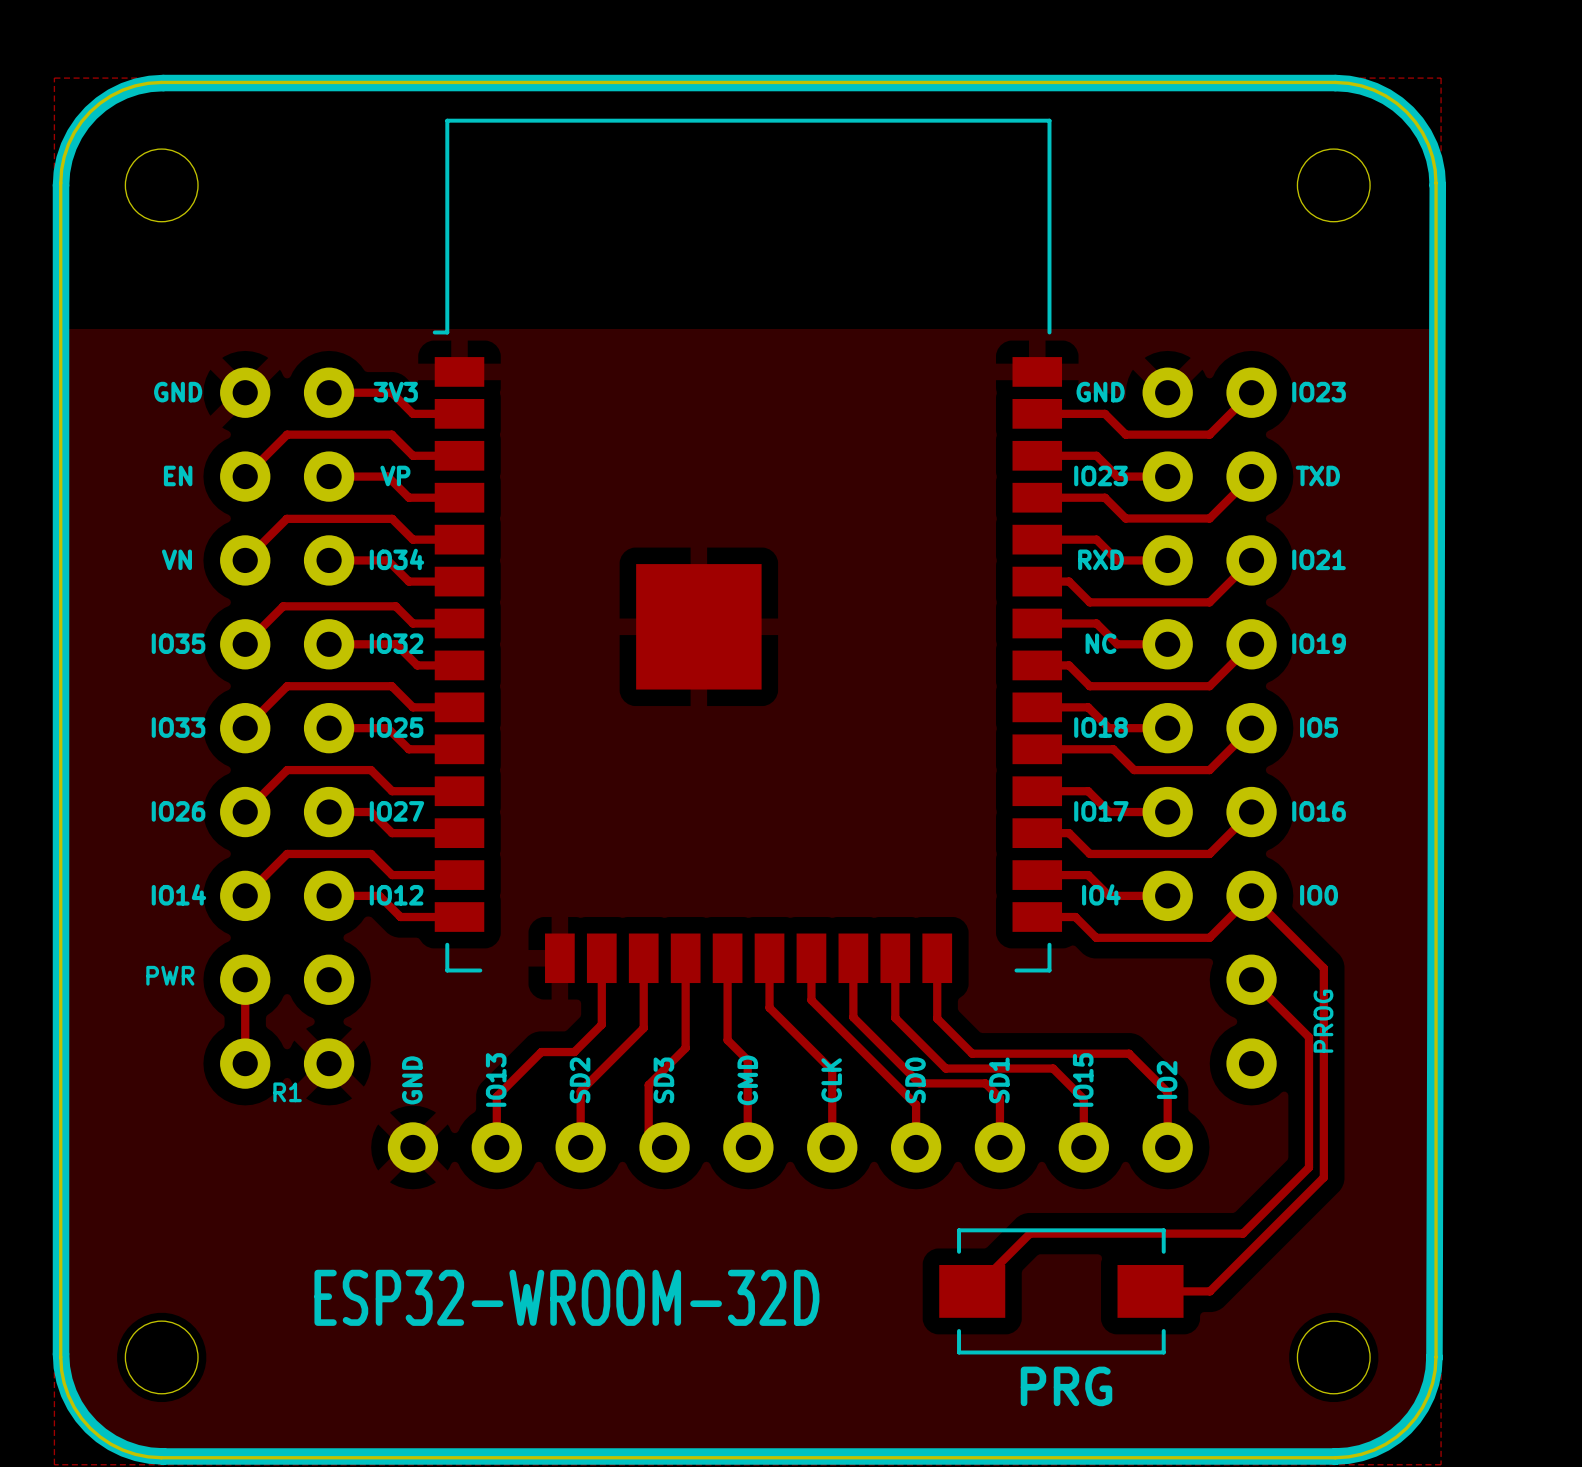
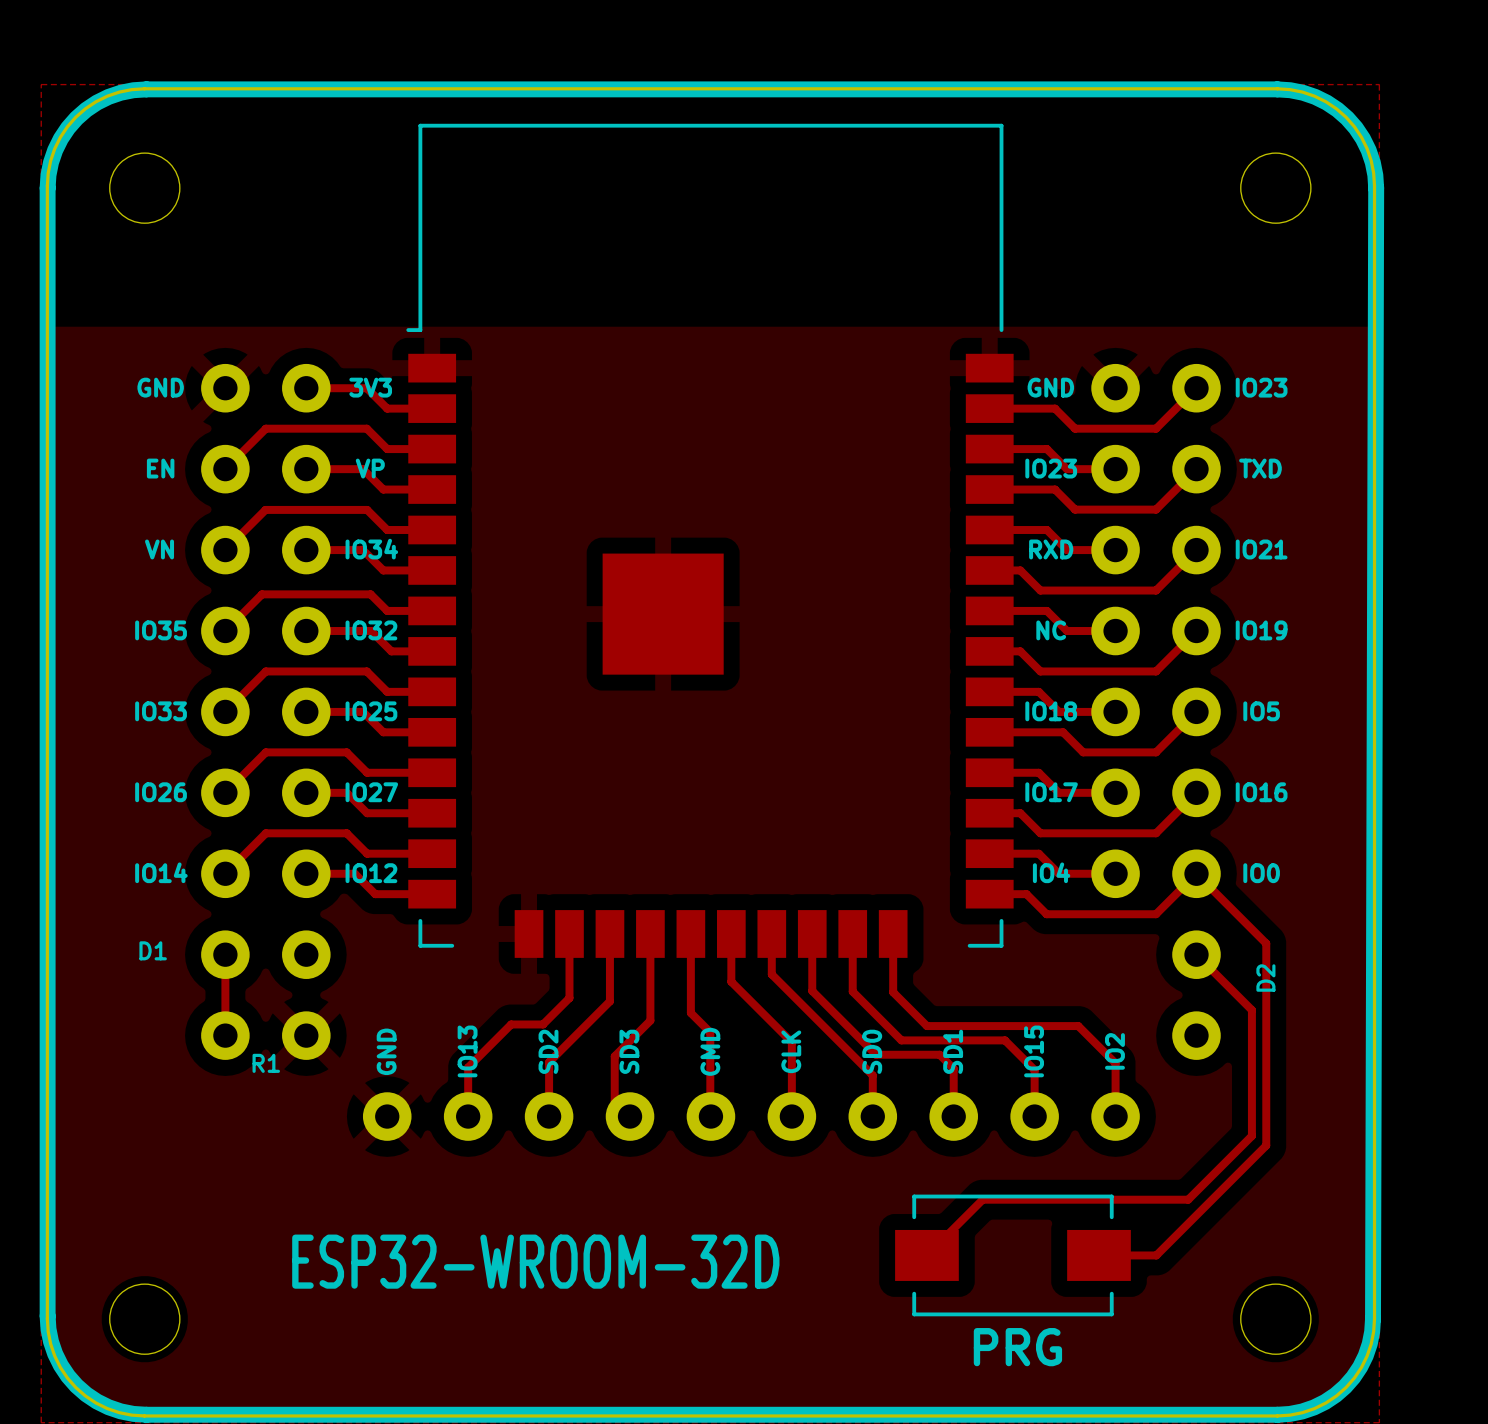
PWR name: PWR (170, 975) -> D1 (153, 950)
PROG name: PROG (1323, 1021) -> D2 (1265, 978)

